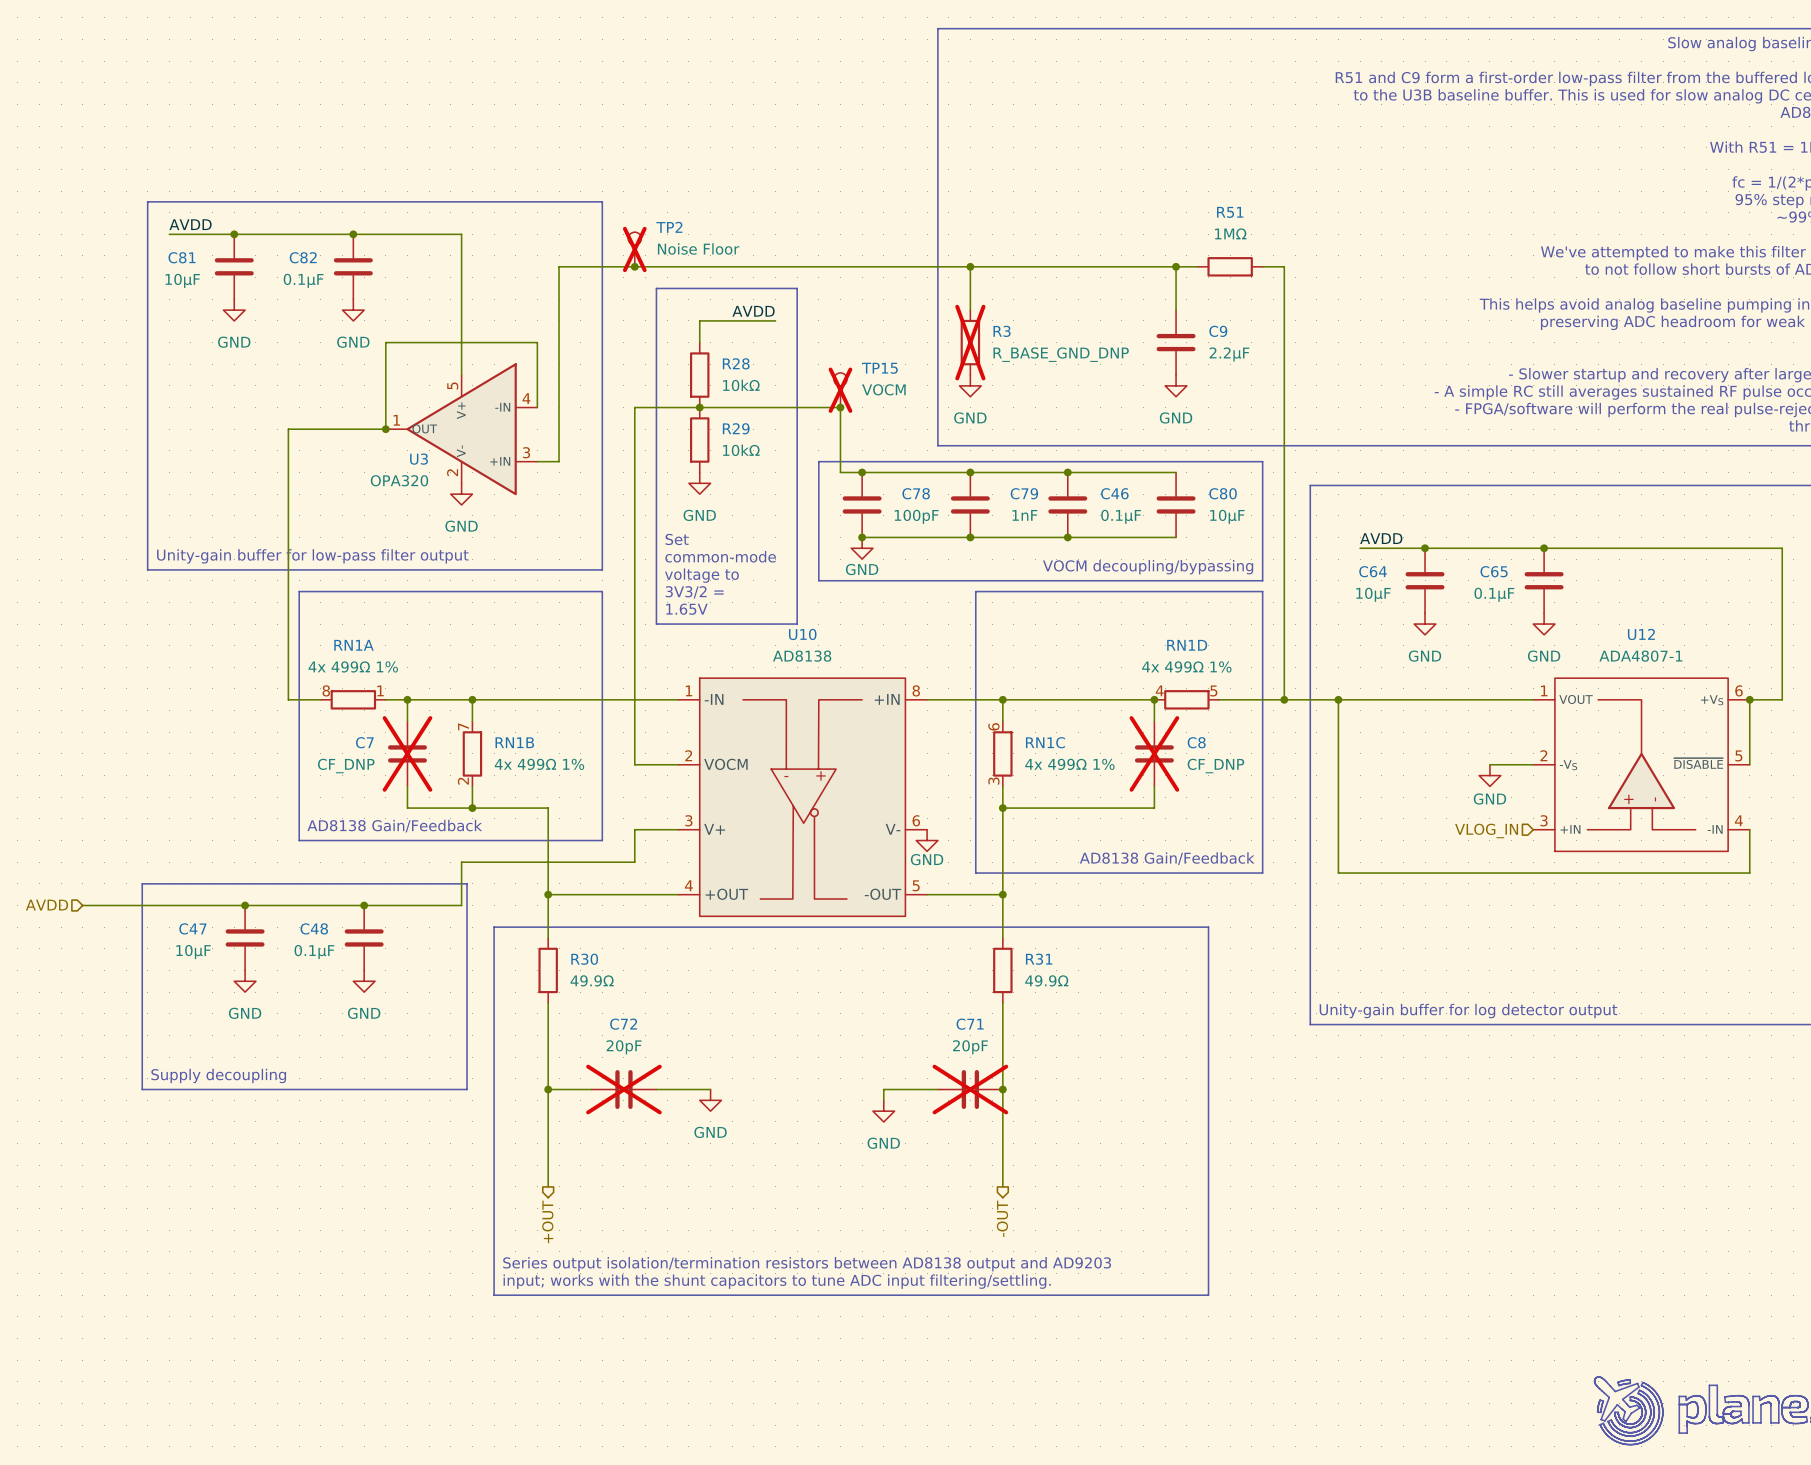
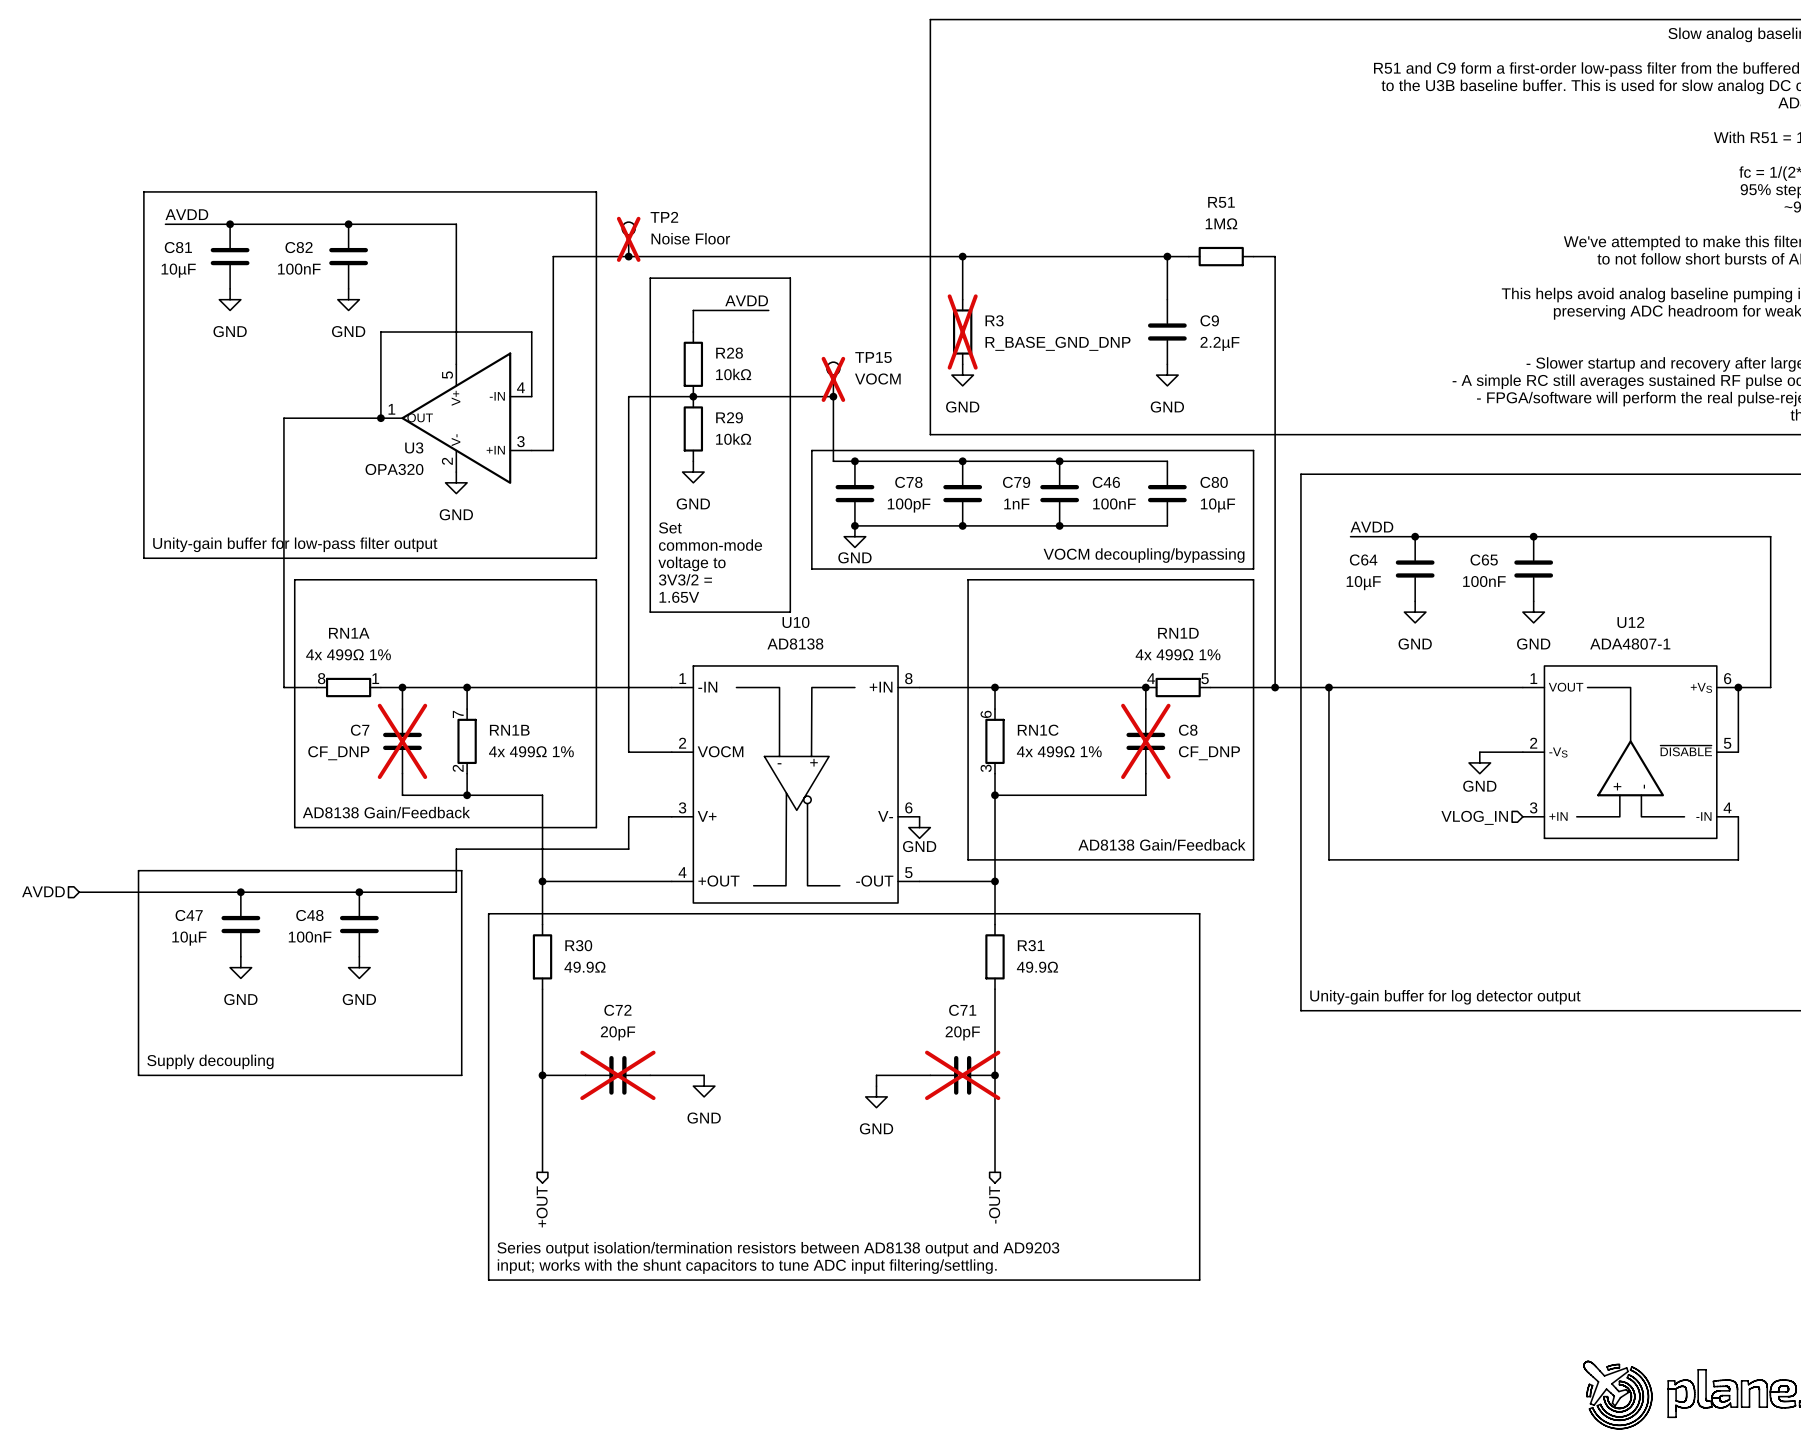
C82 value: 0.1µF (303, 280) -> 100nF (299, 269)
C46 value: 0.1µF (1121, 516) -> 100nF (1114, 503)
C65 value: 0.1µF (1494, 594) -> 100nF (1484, 581)
C48 value: 0.1µF (314, 952) -> 100nF (310, 937)

